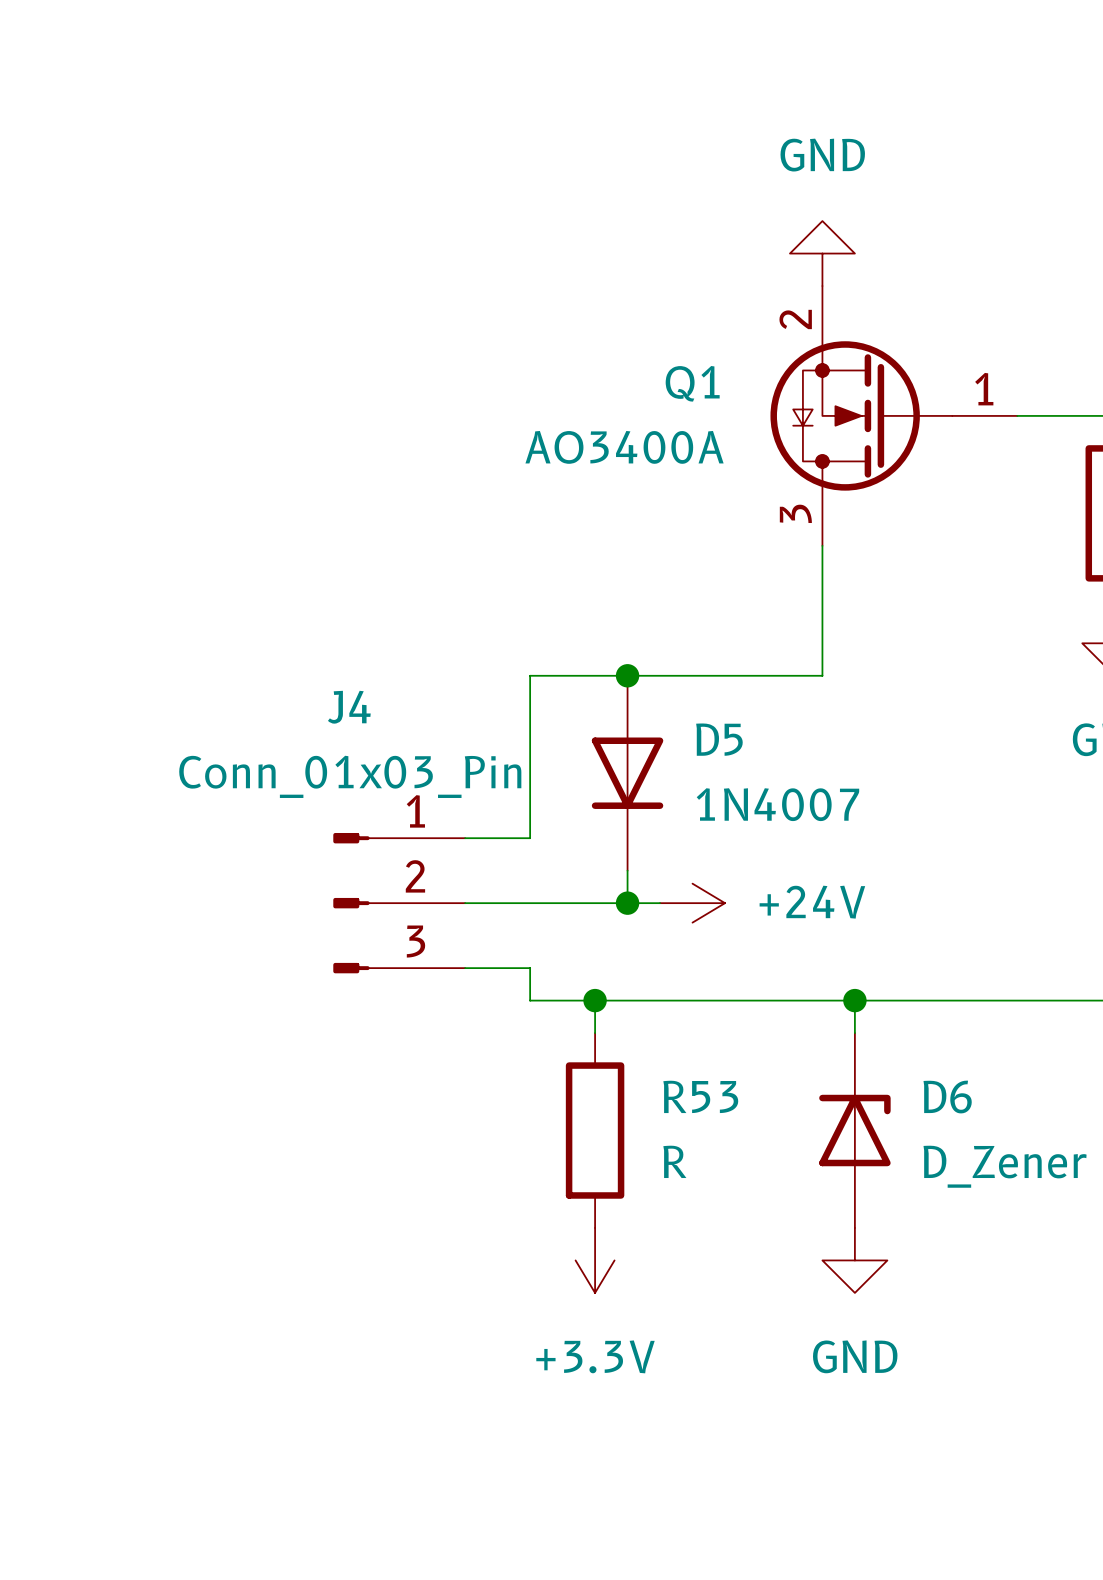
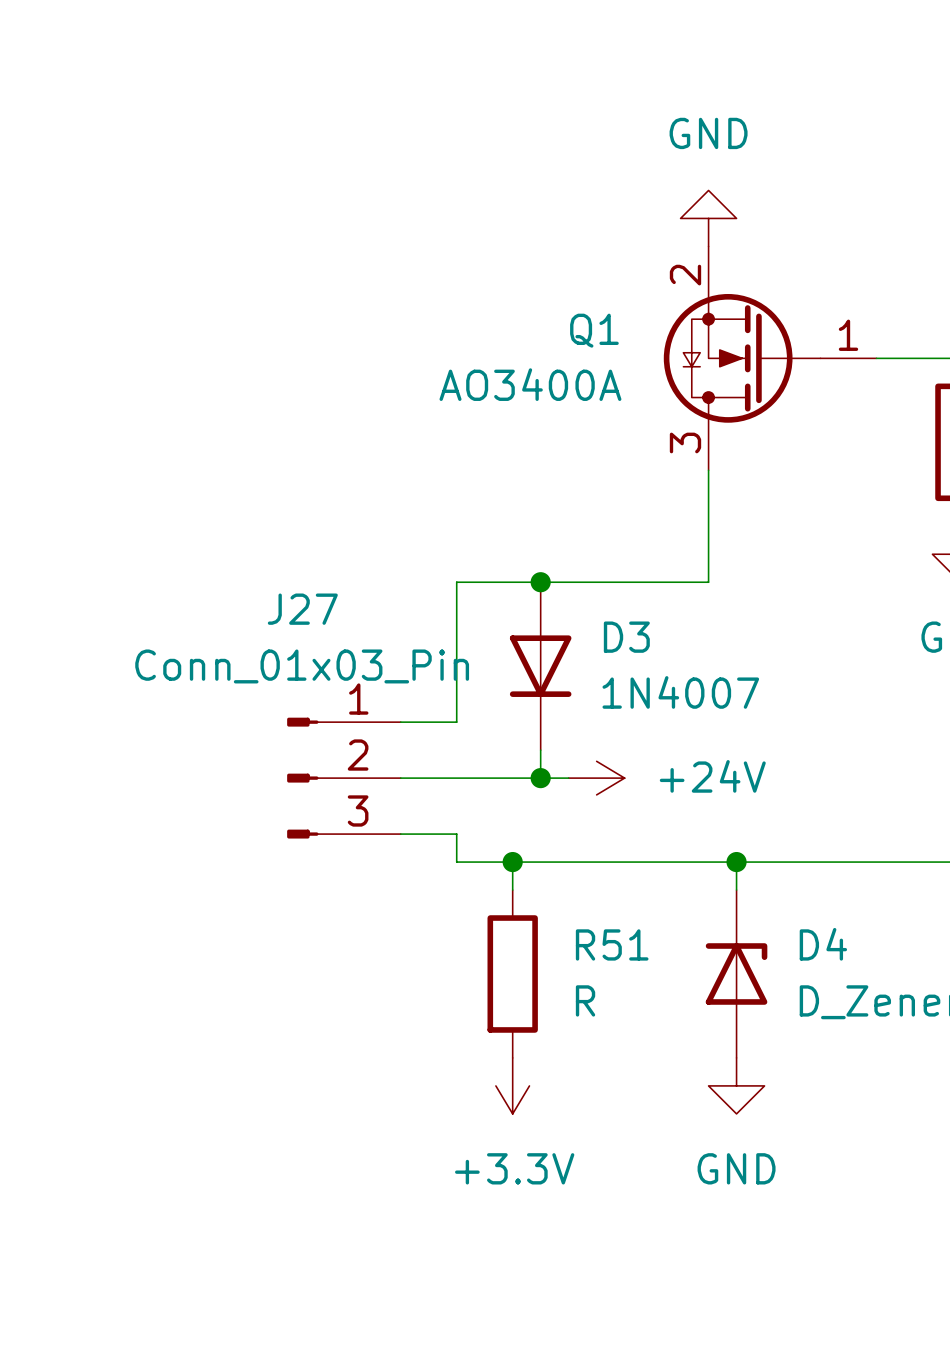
J4 name: J4 (349, 707) -> J27 (302, 609)
D5 name: D5 (719, 739) -> D3 (626, 637)
R53 name: R53 (700, 1096) -> R51 (612, 944)
D6 name: D6 (947, 1097) -> D4 (823, 944)

